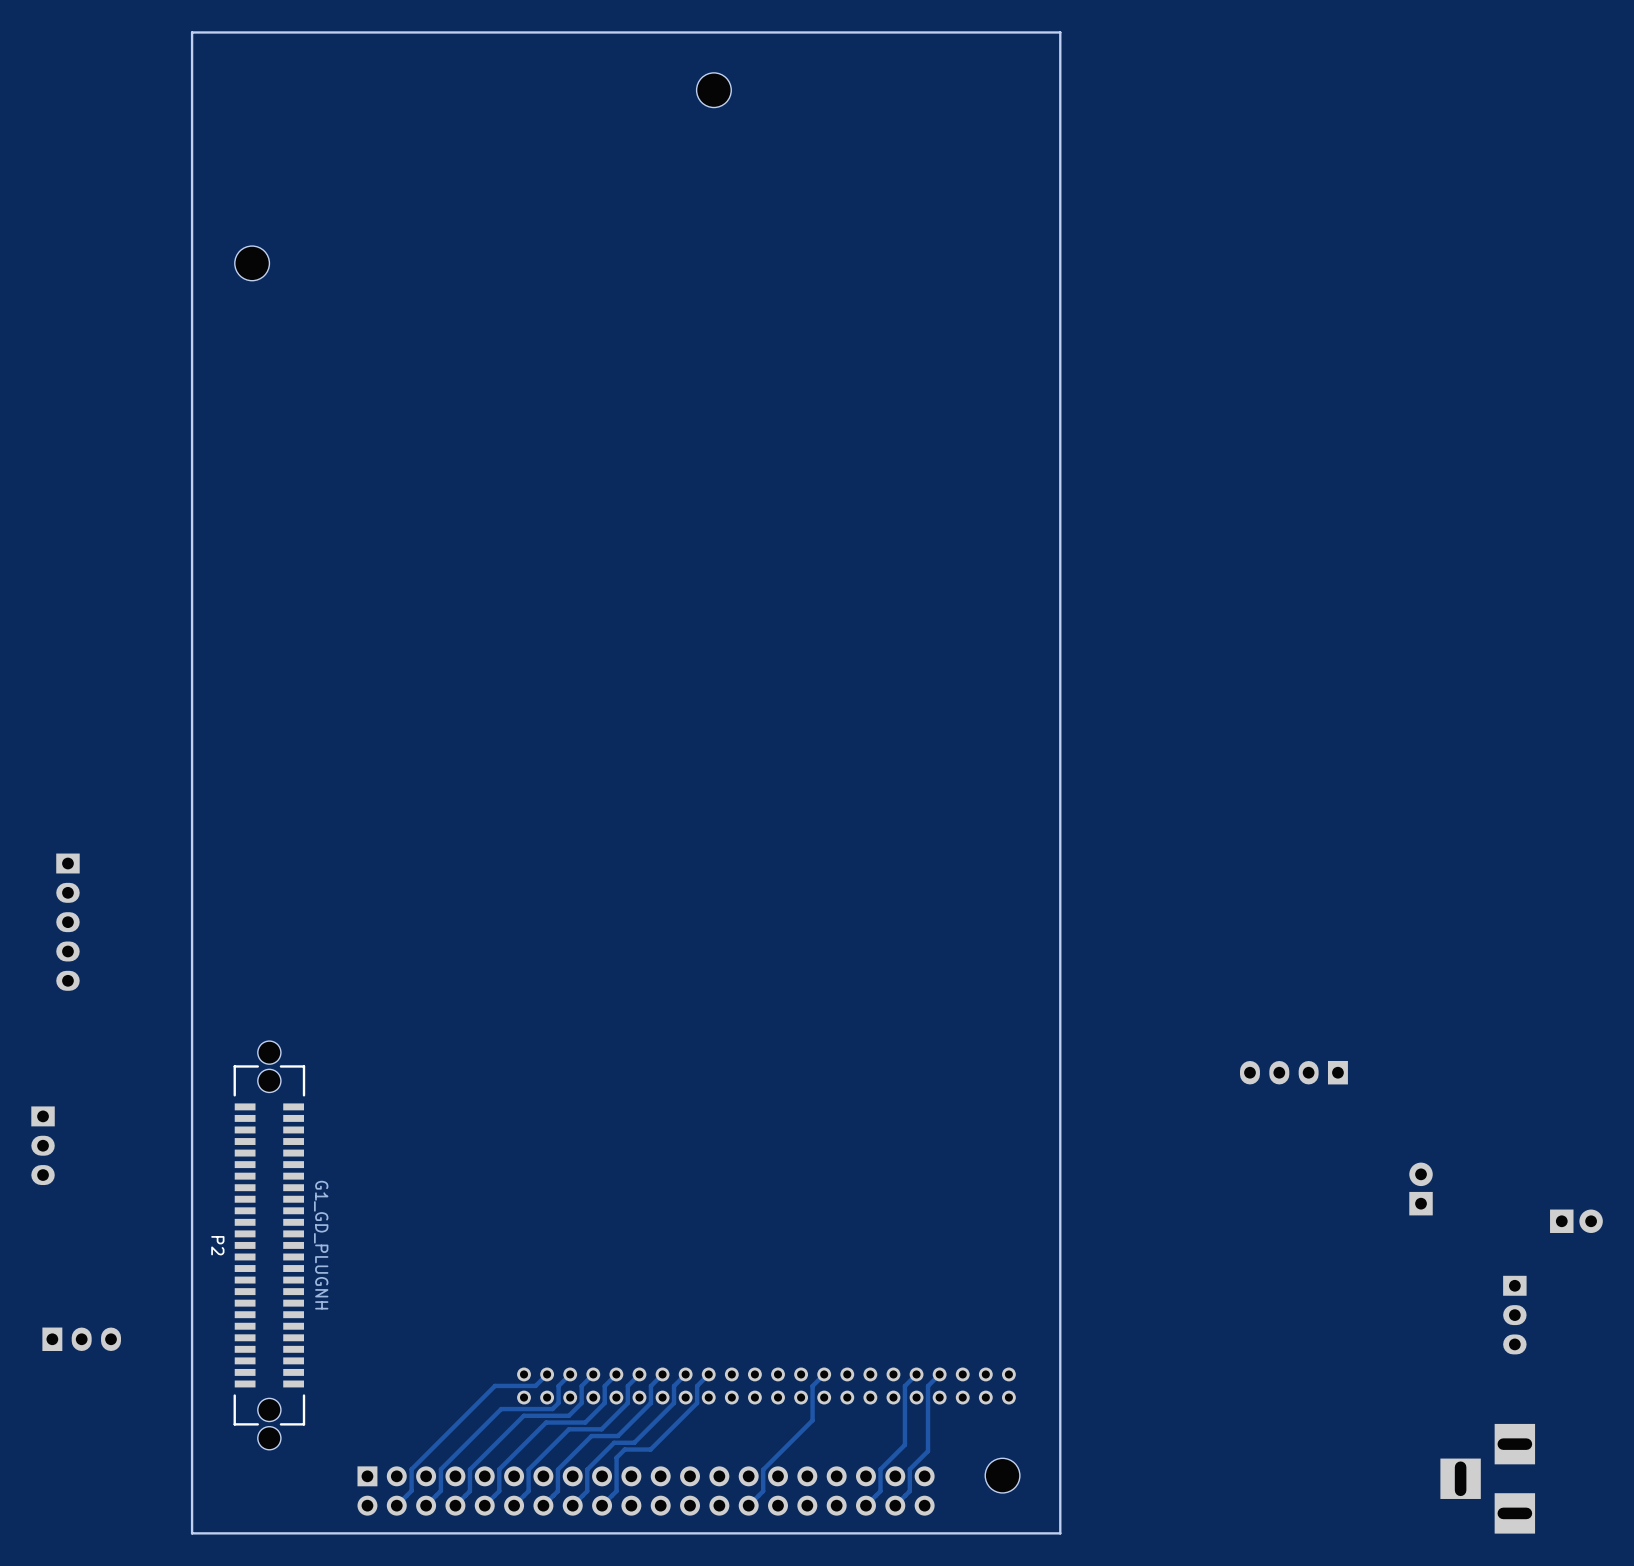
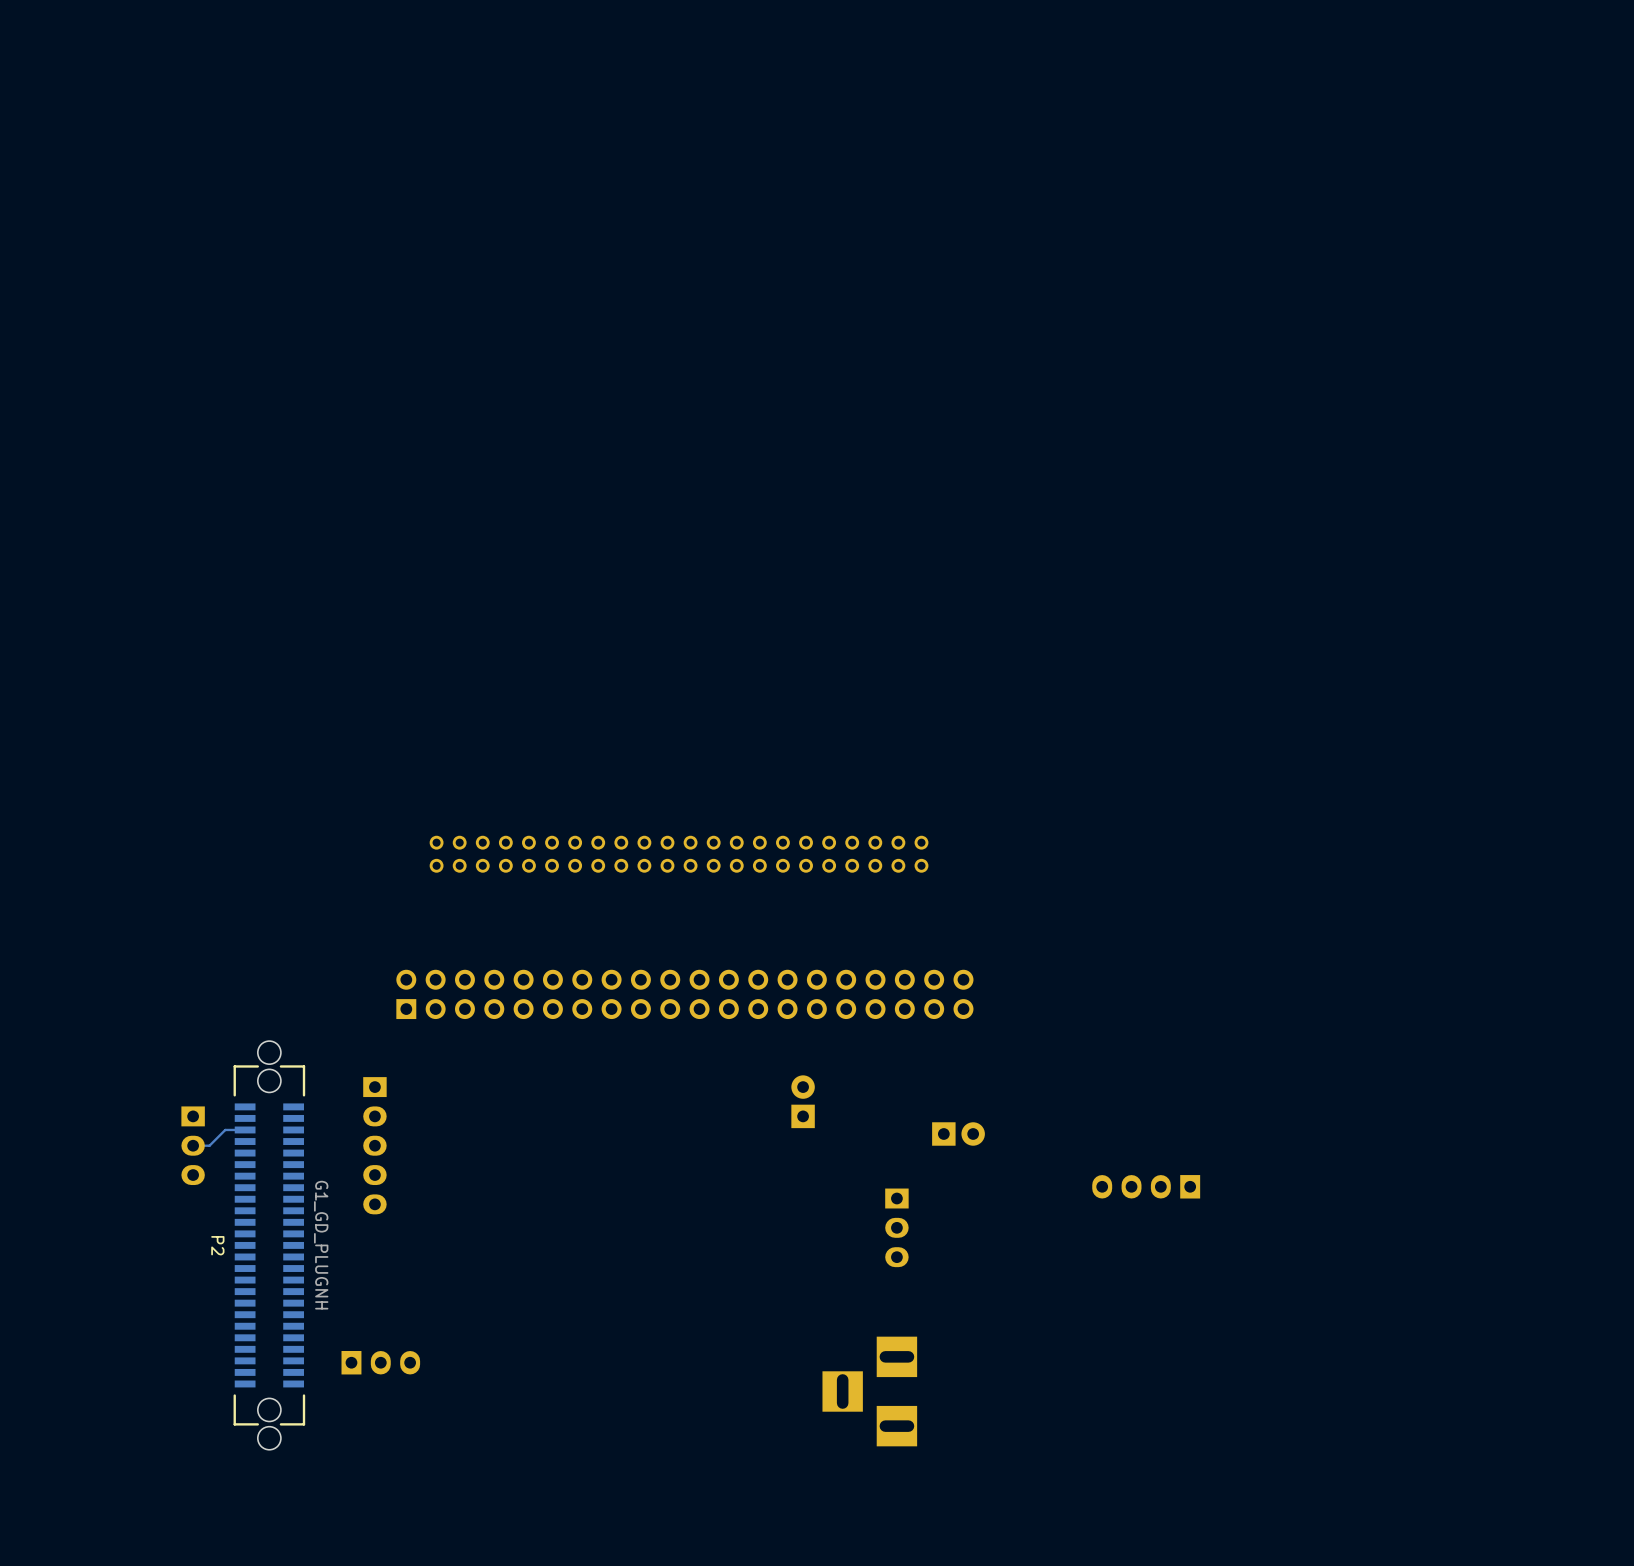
board edge: (1060, 32) (192, 32) (192, 1533) (1060, 1533) (1060, 32) -> none
part: (713, 90) -> none
part: (252, 263) -> none
part: none -> (679, 854)
part: (67, 922) -> none
part: none -> (684, 994)
part position: (1293, 1072) -> (1146, 1186)
part: none -> (803, 1101)
track: none -> (245, 1129) (225, 1129) (209, 1145) (193, 1145)
part: none -> (958, 1133)
part: (43, 1145) -> none
part: none -> (193, 1145)
part: none -> (374, 1145)
part: (1421, 1189) -> none
part: (1576, 1221) -> none
part: none -> (896, 1227)
part: (1514, 1315) -> none
part: (81, 1339) -> none
part: none -> (380, 1362)
track: (547, 1374) (535, 1385) (495, 1385) (411, 1469) (411, 1490) (396, 1505) -> none
track: (570, 1374) (558, 1386) (558, 1403) (552, 1409) (501, 1409) (440, 1469) (440, 1490) (426, 1505) -> none
track: (593, 1374) (581, 1386) (581, 1403) (568, 1415) (523, 1415) (469, 1469) (469, 1491) (455, 1505) -> none
track: (616, 1374) (604, 1386) (604, 1403) (585, 1422) (546, 1422) (499, 1469) (499, 1491) (484, 1505) -> none
track: (639, 1374) (627, 1386) (627, 1403) (601, 1429) (568, 1429) (528, 1469) (528, 1491) (514, 1505) -> none
track: (662, 1374) (650, 1386) (650, 1403) (617, 1436) (591, 1436) (557, 1469) (557, 1491) (543, 1505) -> none
track: (685, 1374) (674, 1386) (674, 1403) (634, 1442) (614, 1442) (587, 1469) (587, 1491) (572, 1505) -> none
track: (708, 1374) (697, 1386) (697, 1403) (650, 1449) (624, 1449) (616, 1457) (616, 1491) (602, 1505) -> none
track: (824, 1374) (812, 1386) (812, 1420) (763, 1469) (763, 1491) (748, 1505) -> none
track: (916, 1374) (904, 1386) (904, 1444) (880, 1469) (880, 1491) (865, 1505) -> none
track: (939, 1374) (928, 1386) (928, 1451) (909, 1469) (909, 1491) (895, 1505) -> none
part: (766, 1386) -> none
part: none -> (869, 1391)
part: (1002, 1475) -> none
part: (1487, 1478) -> none
part: (646, 1491) -> none

